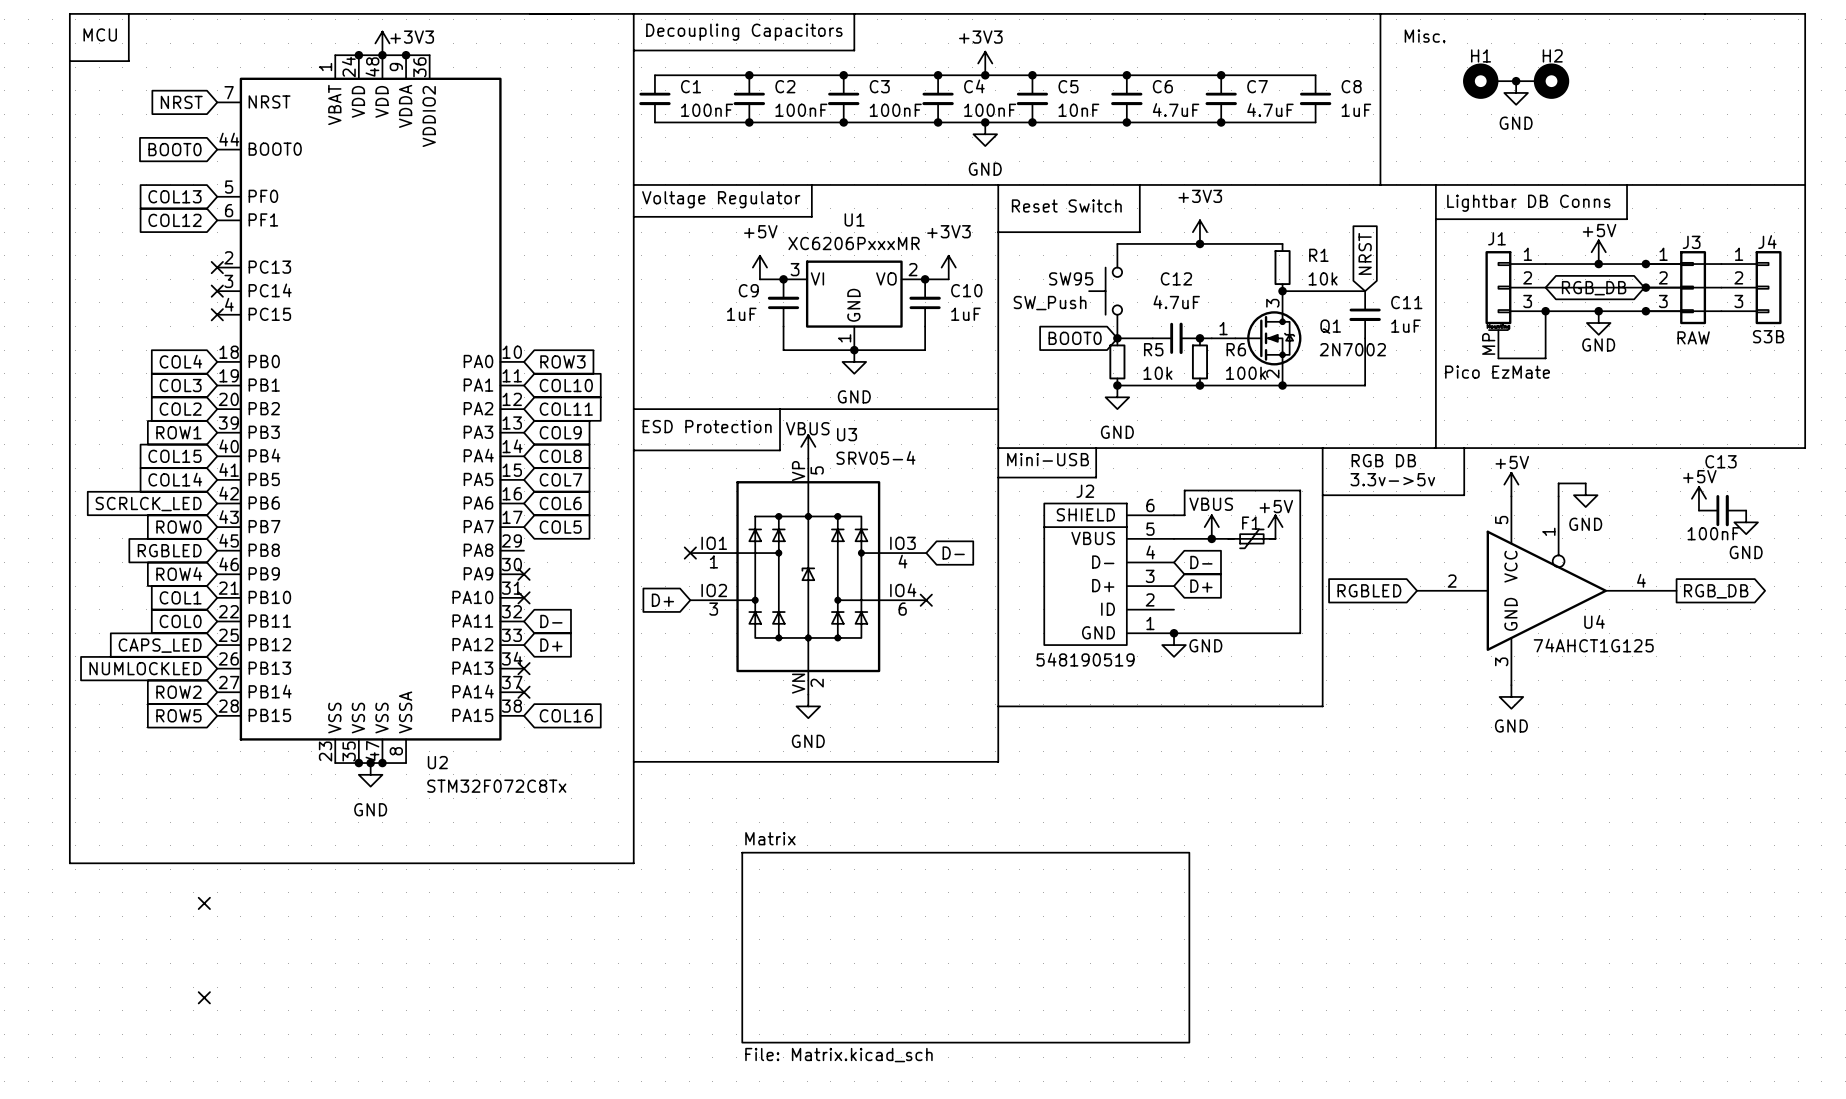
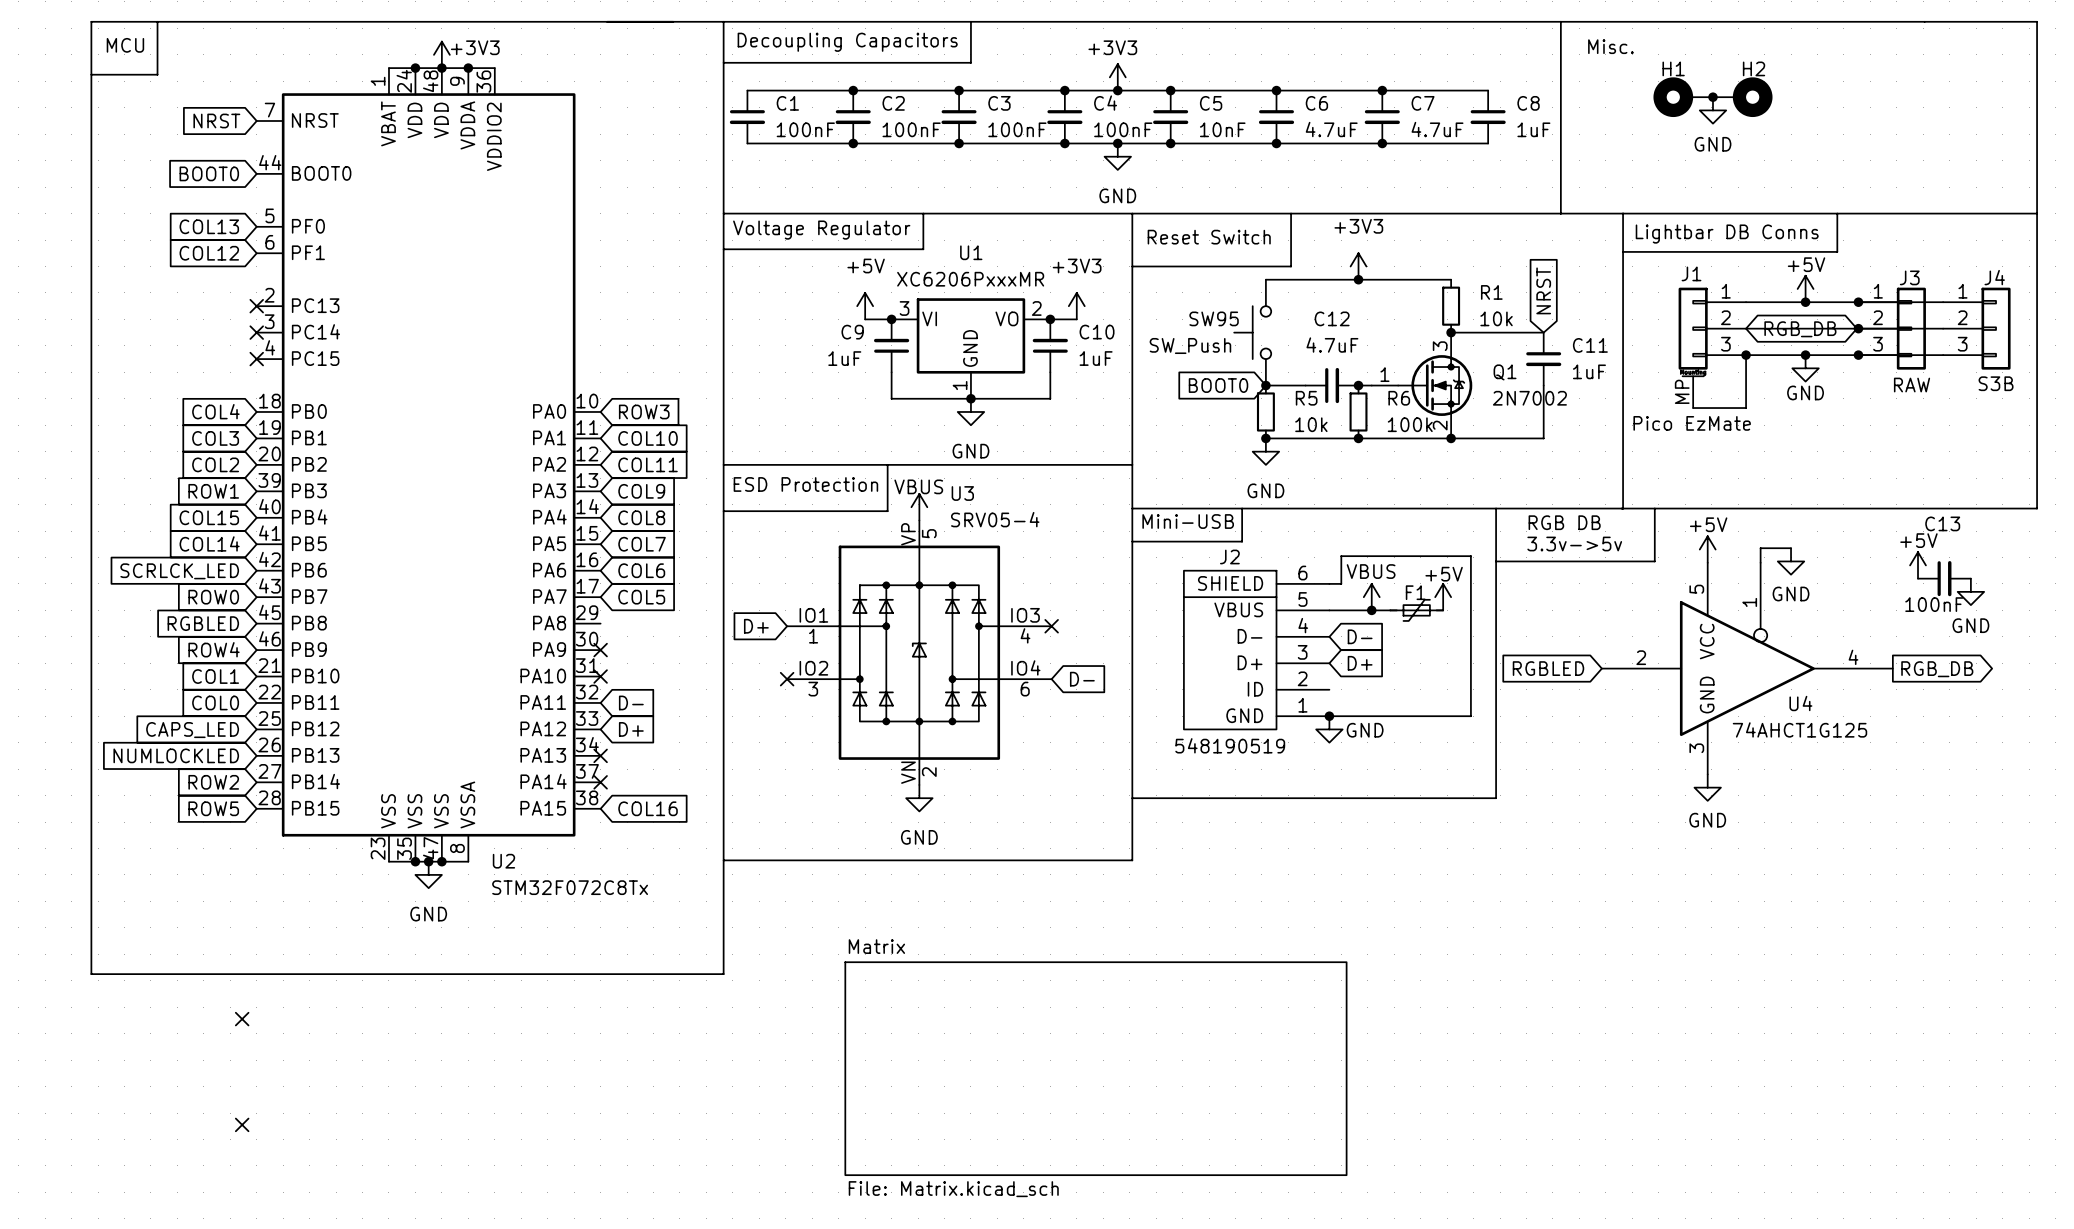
no-connect mark position: (690, 553) -> (787, 679)
global label position: D- (953, 553) -> D- (1082, 679)
global label position: D+ (662, 600) -> D+ (756, 626)
no-connect mark position: (926, 600) -> (1051, 626)

